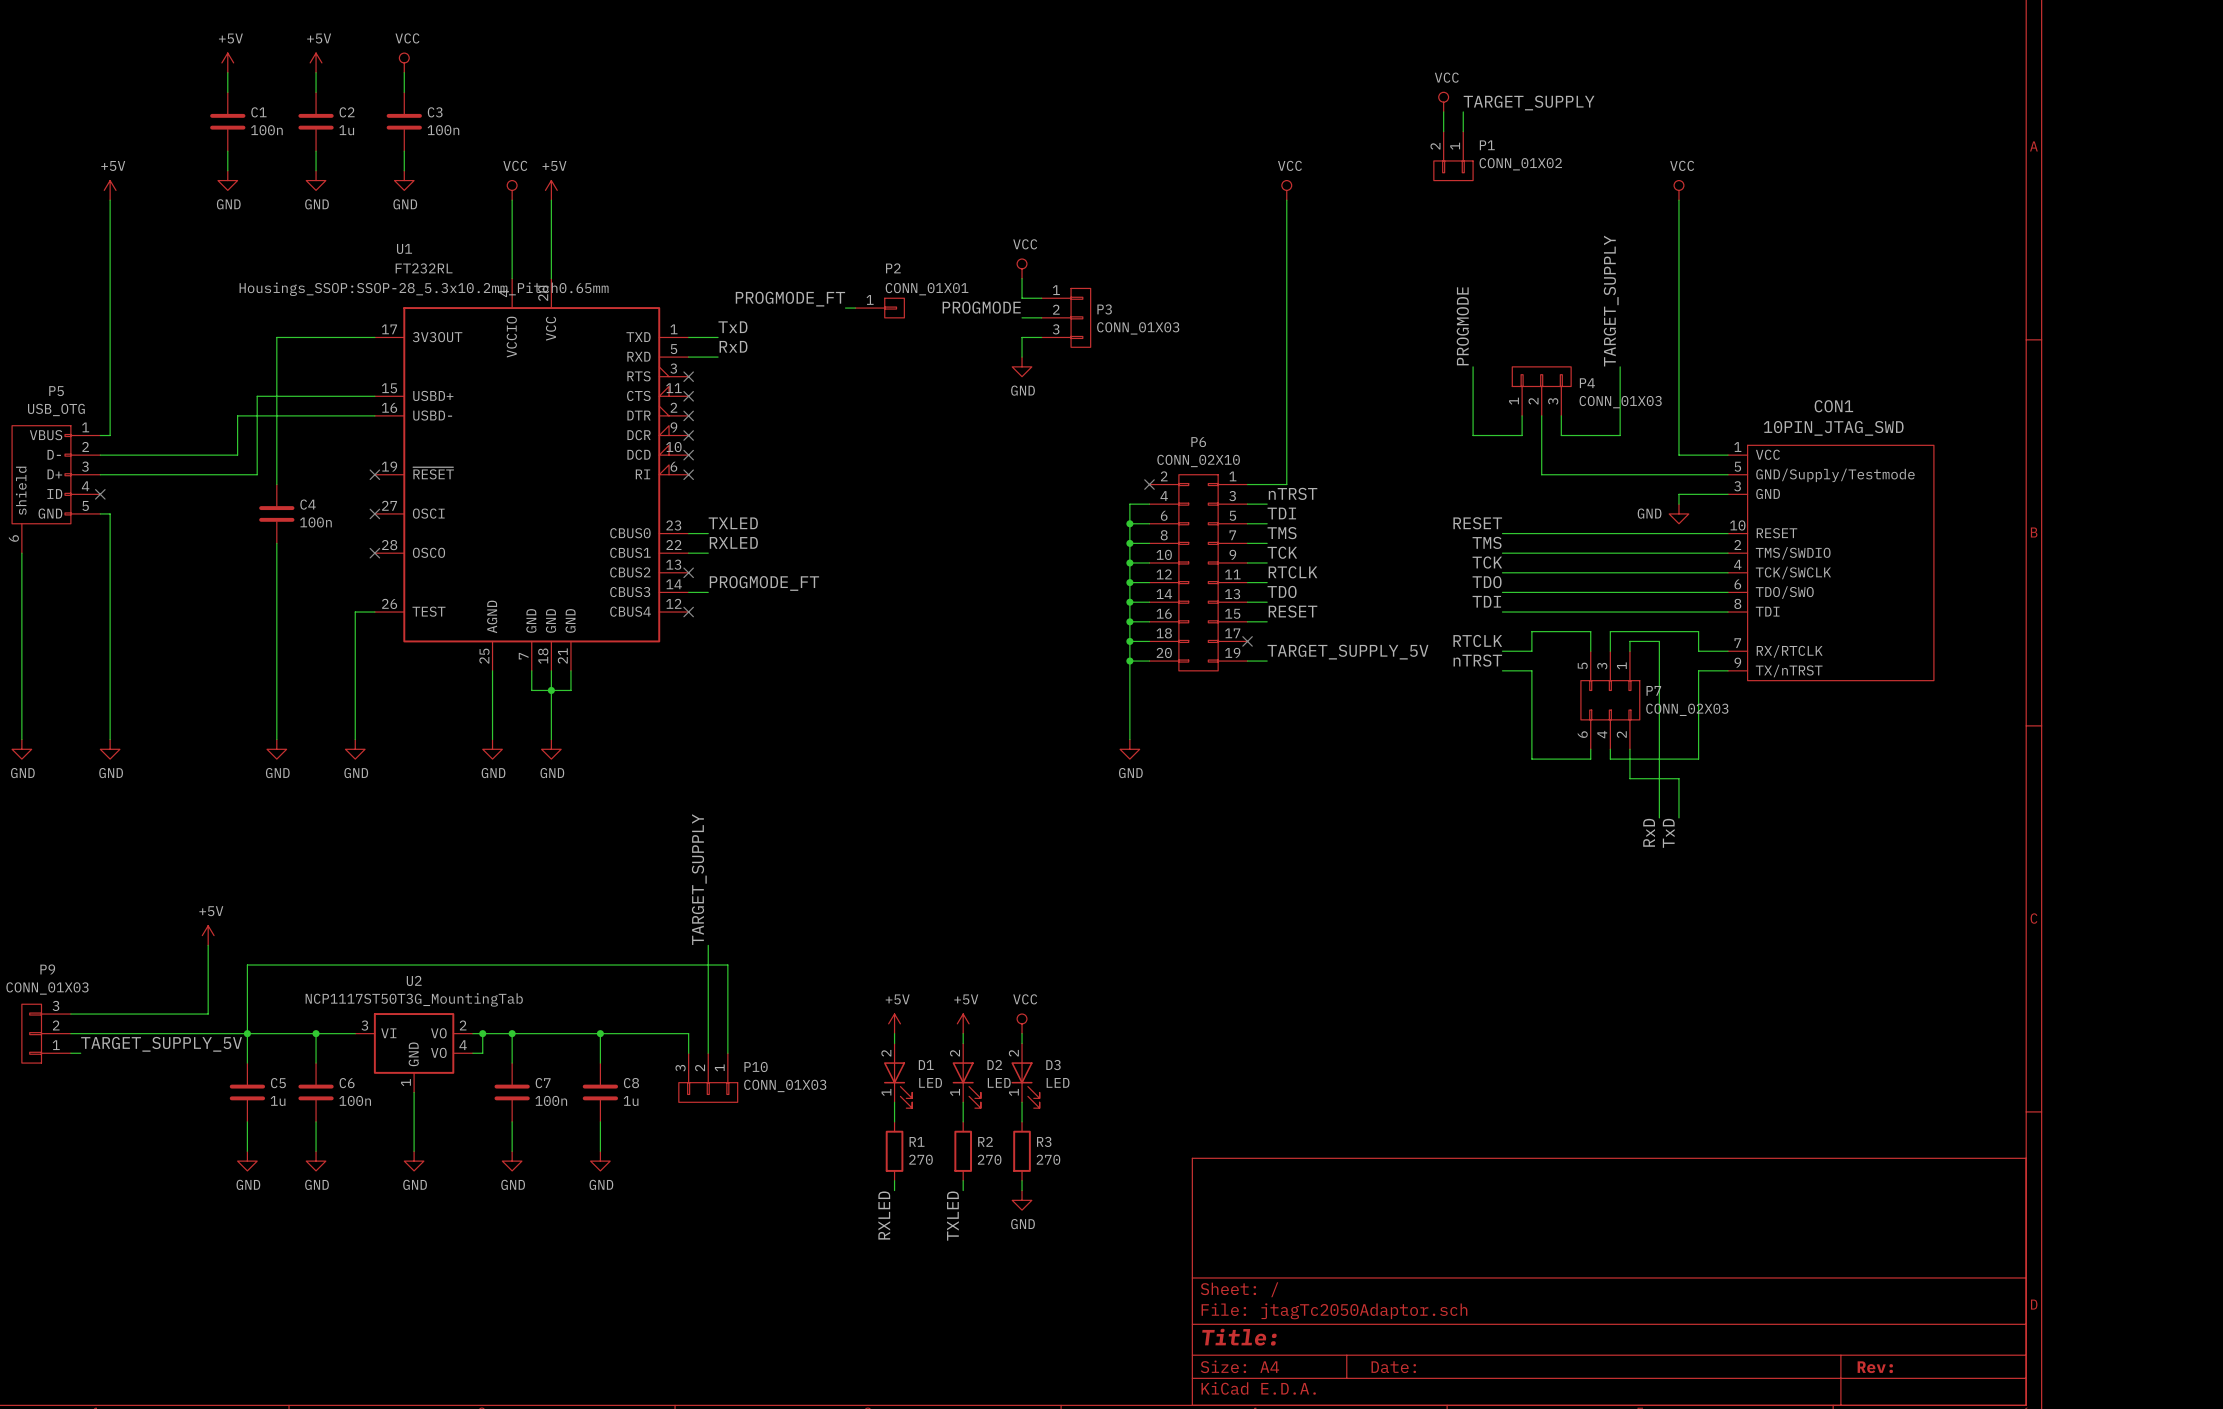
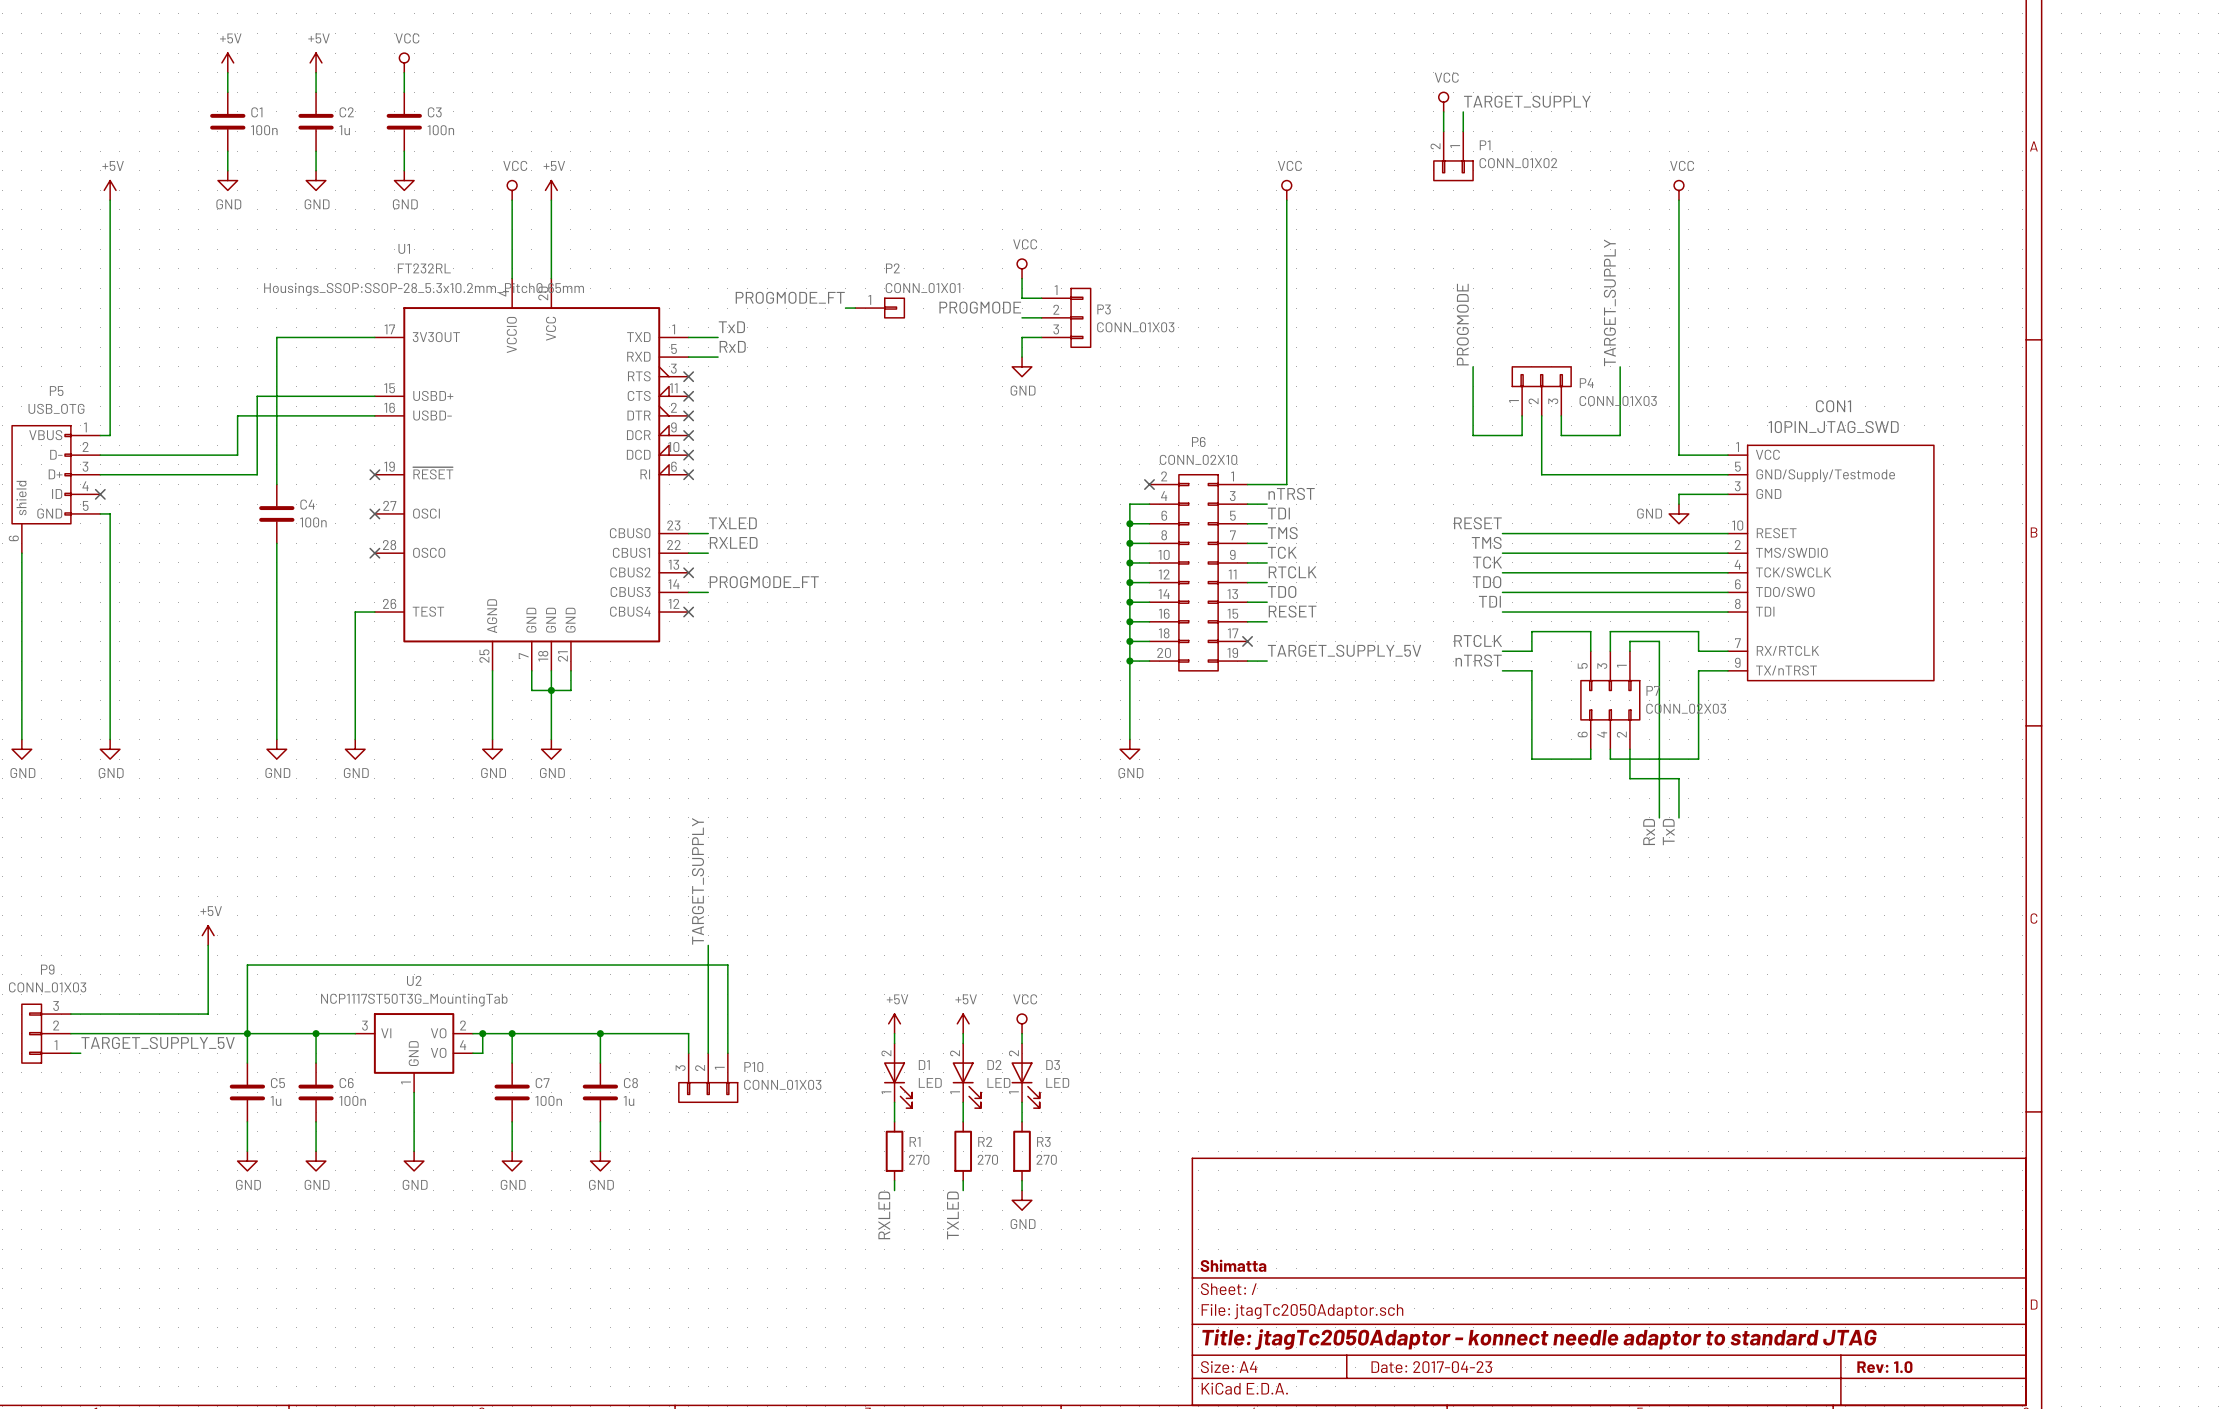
title block: none -> Shimatta (1233, 1265)
title block: Title: (1239, 1337) -> Title: jtagTc2050Adaptor - konnect needle adaptor to standard JTAG (1539, 1339)
title block: Date: (1393, 1367) -> Date: 2017-04-23 (1431, 1367)
title block: Rev: (1875, 1367) -> Rev: 1.0 (1884, 1367)

